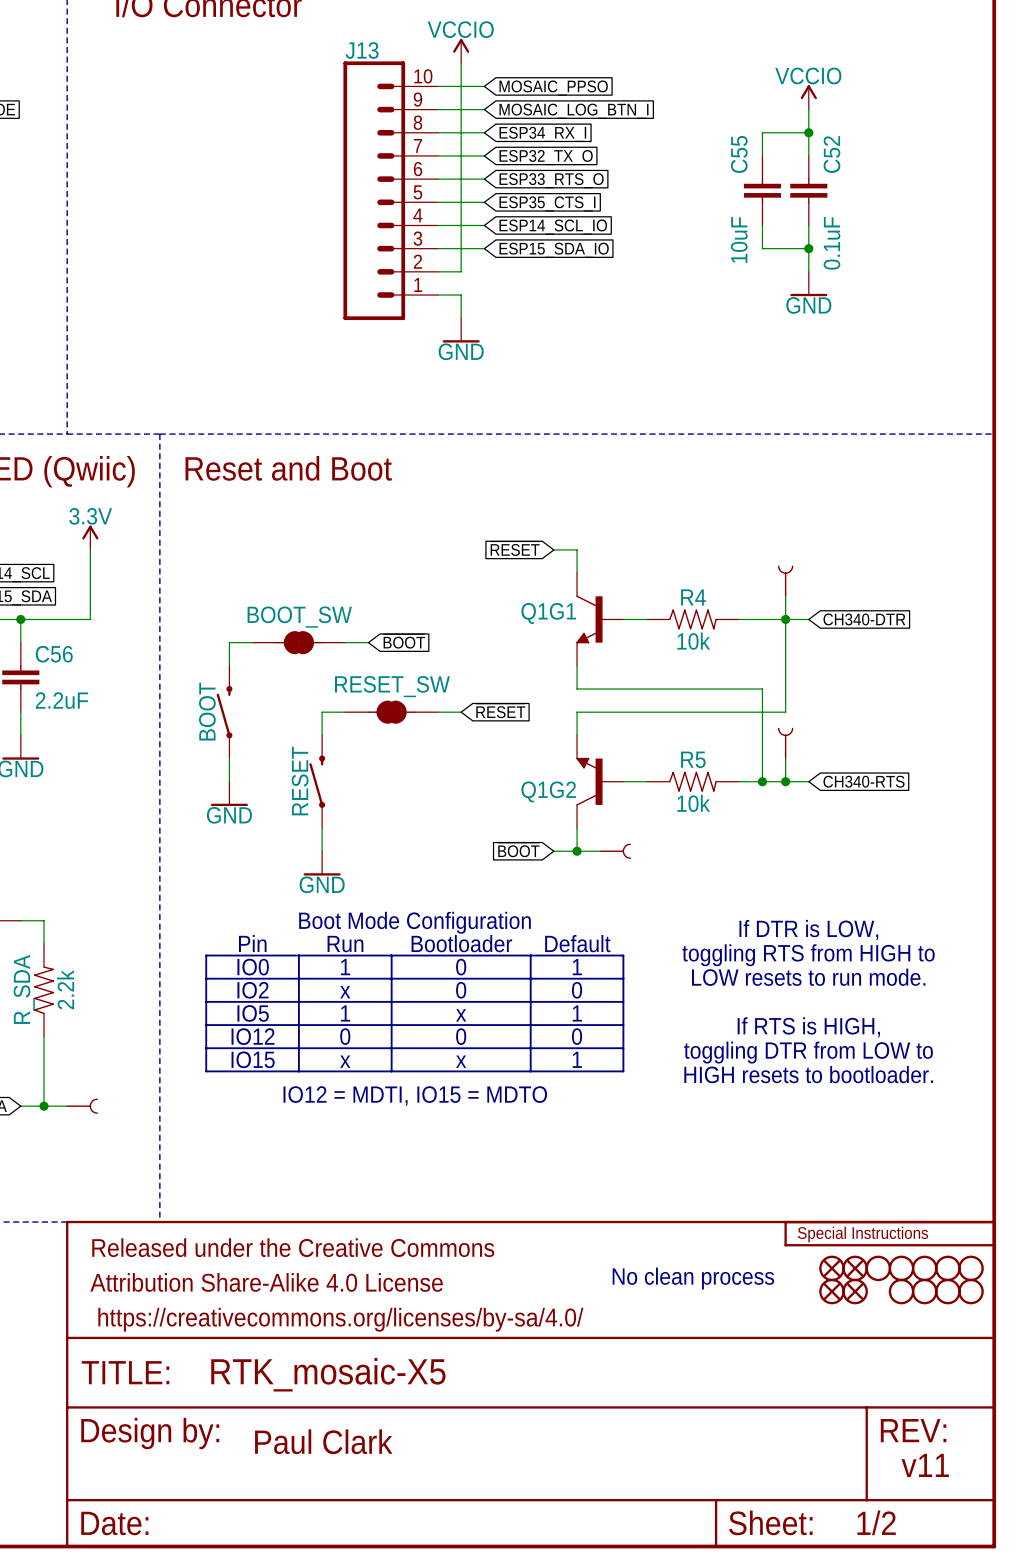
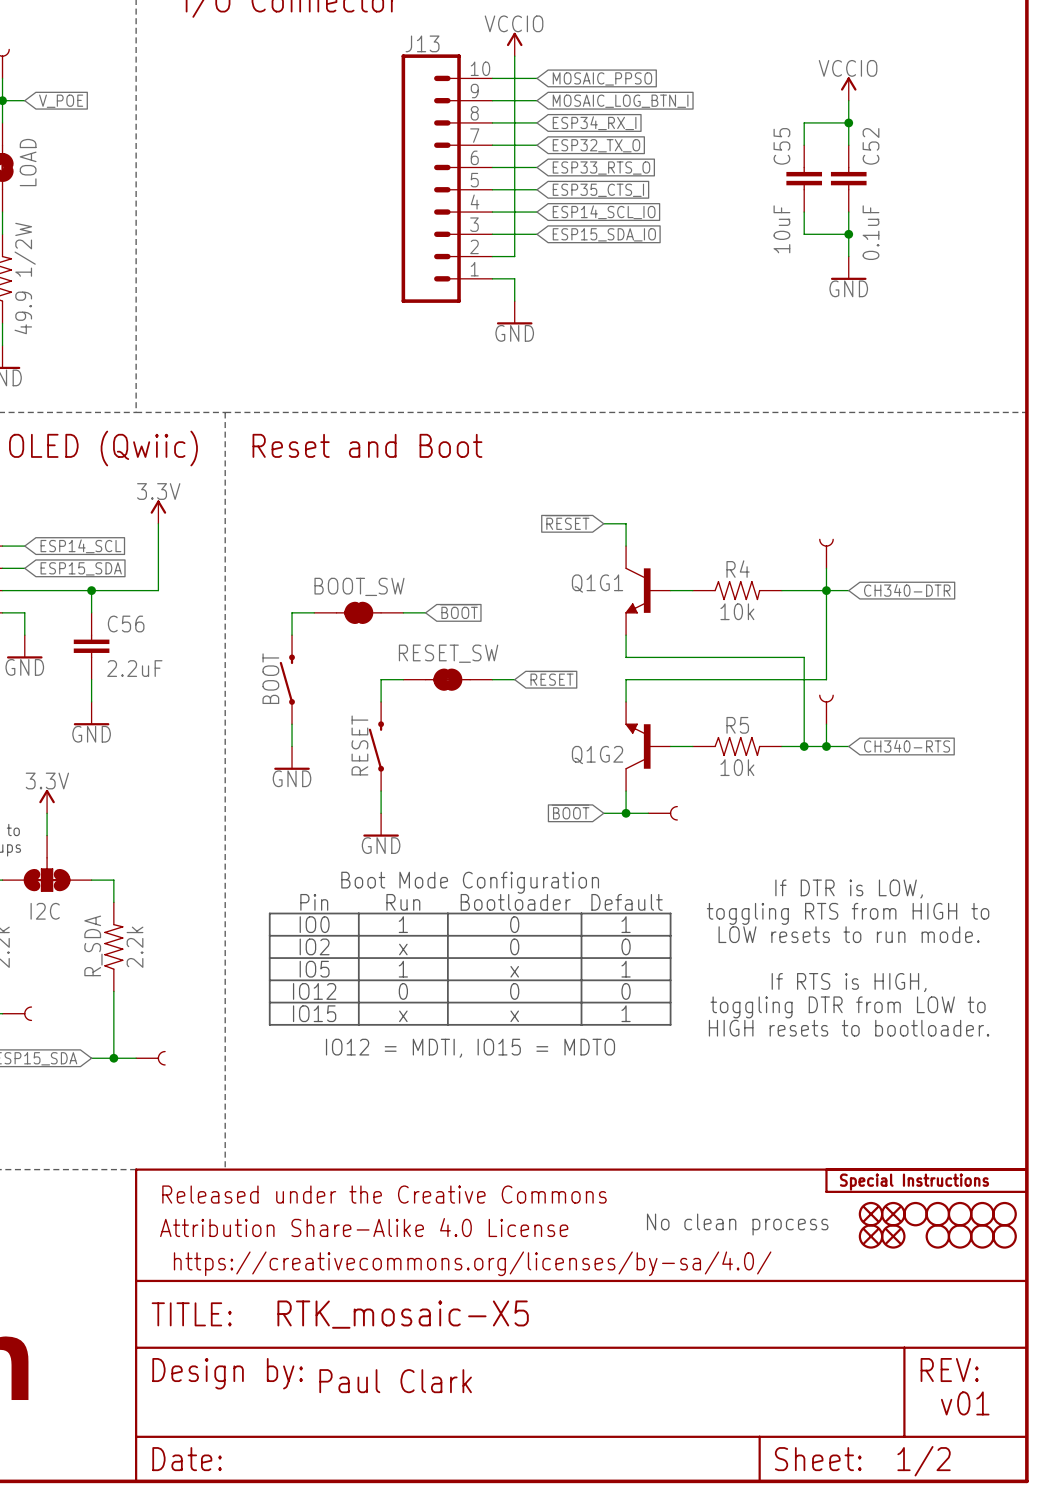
text: v11 (925, 1465) -> v01 (965, 1403)

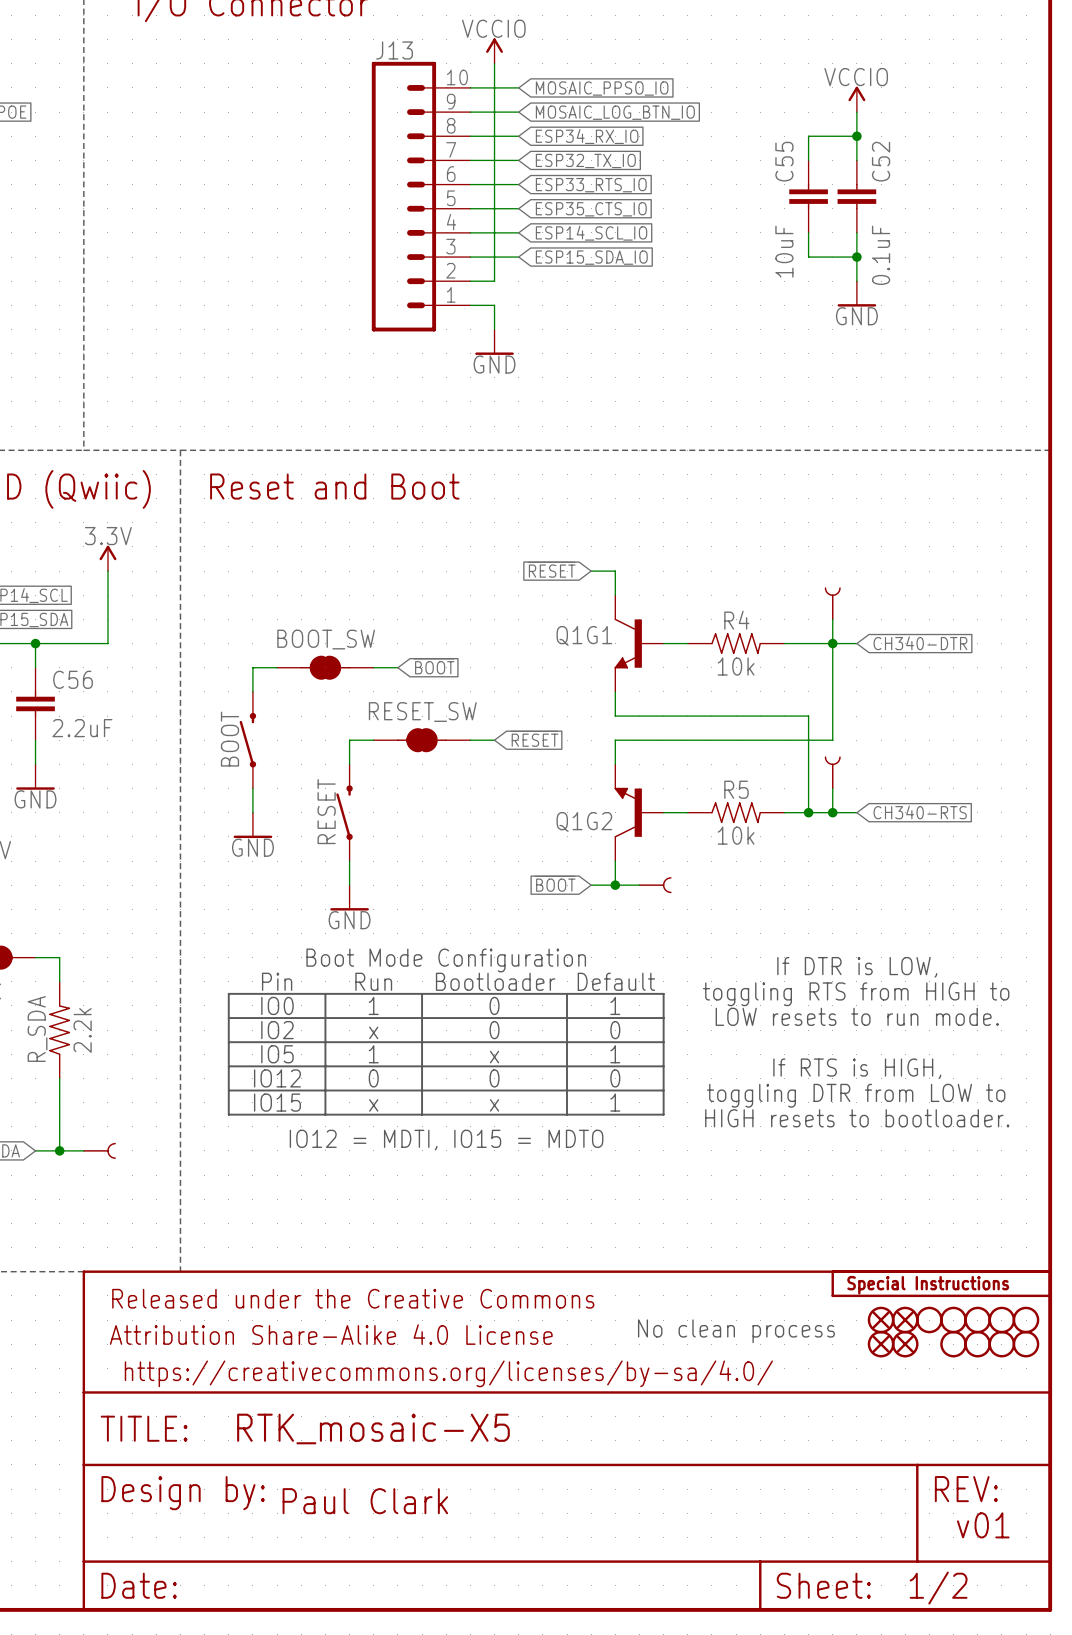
global label: MOSAIC_PPSO (602, 78) -> MOSAIC_PPSO_IO (602, 88)
global label: MOSAIC_LOG_BTN_I (620, 101) -> MOSAIC_LOG_BTN_IO (615, 112)
global label: ESP34_RX_I (594, 123) -> ESP34_RX_IO (587, 136)
global label: ESP32_TX_O (596, 145) -> ESP32_TX_IO (585, 160)
global label: ESP33_RTS_O (601, 168) -> ESP33_RTS_IO (591, 185)
global label: ESP35_CTS_I (598, 190) -> ESP35_CTS_IO (591, 209)

